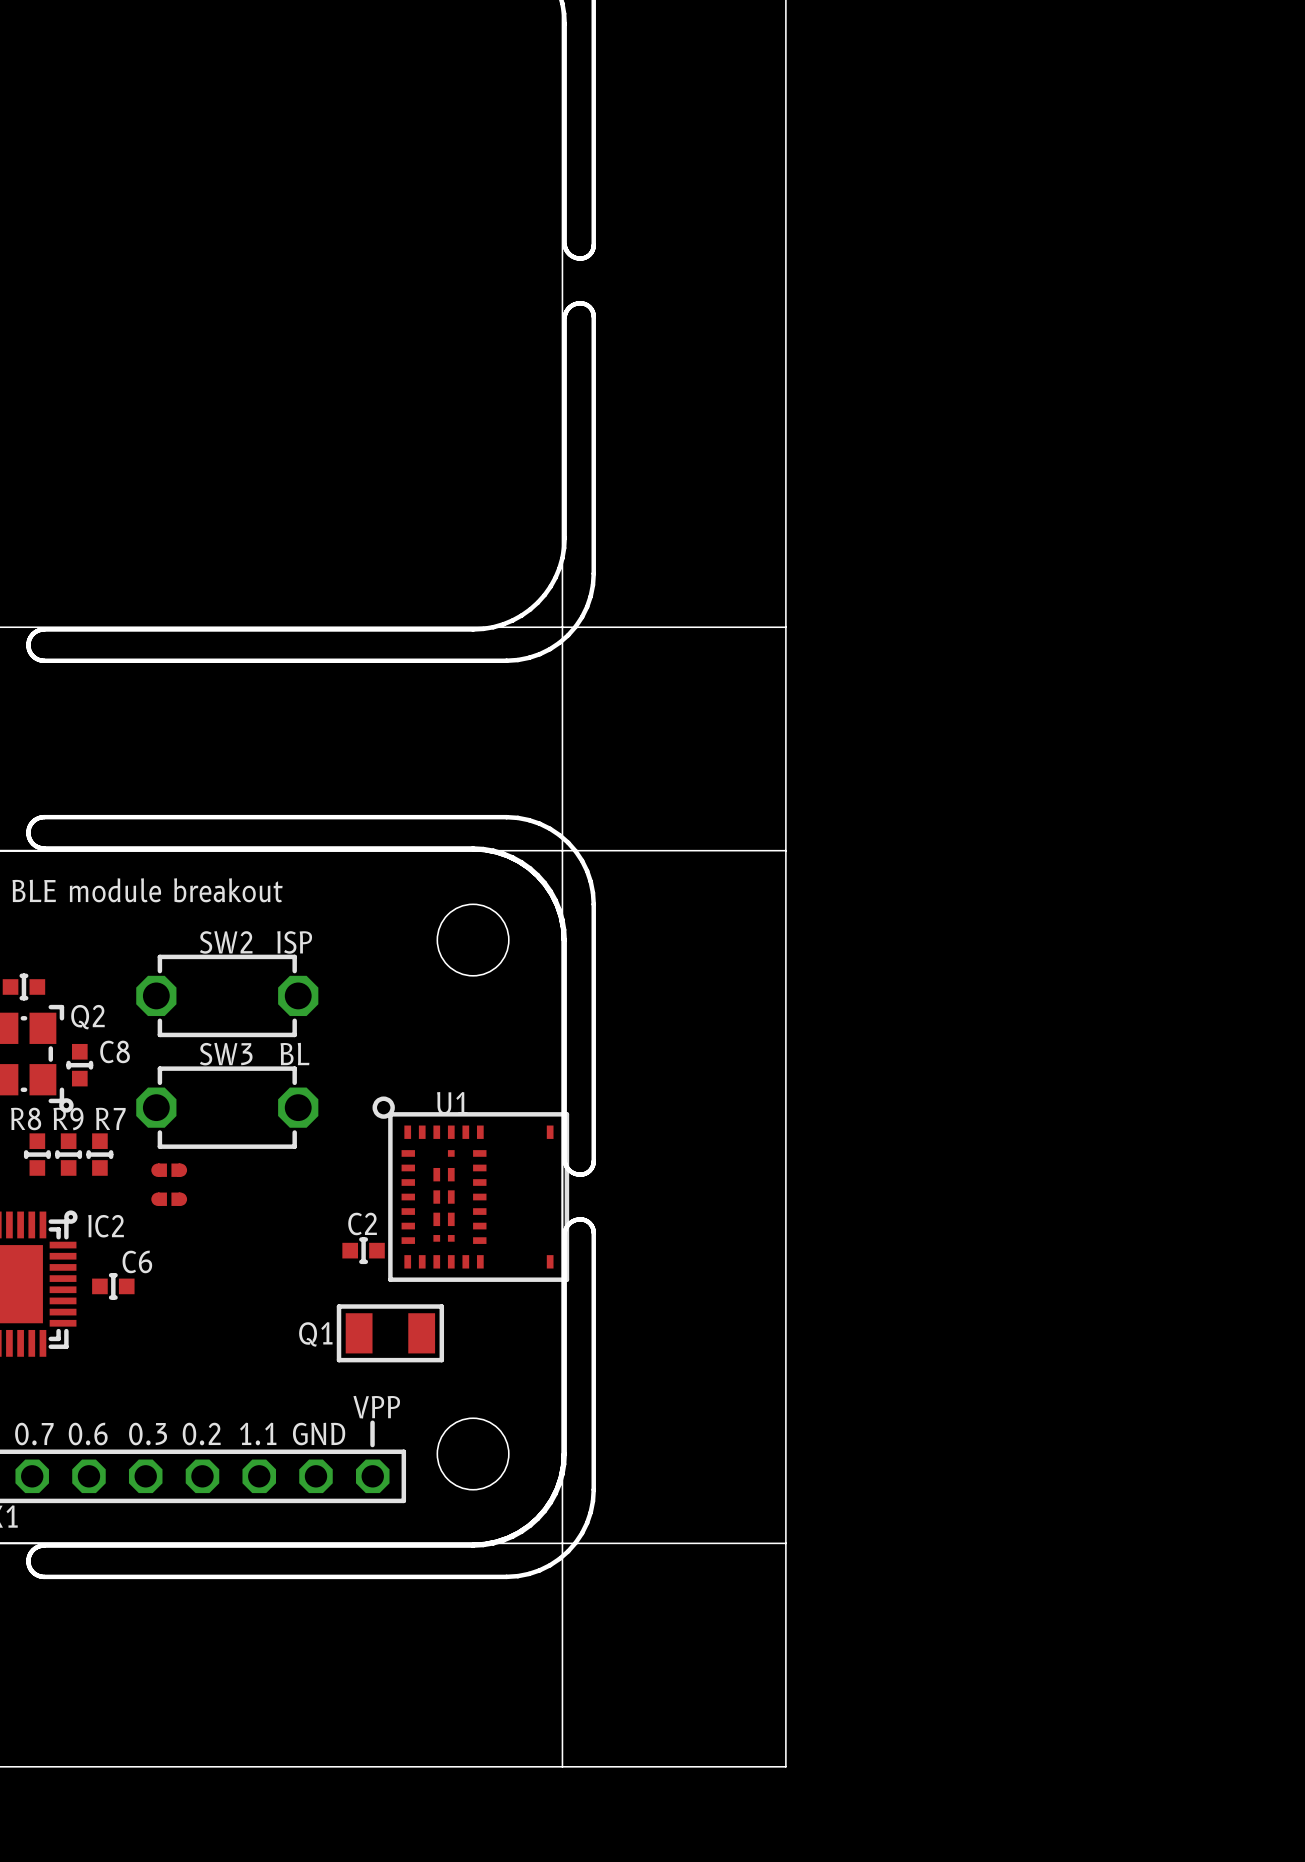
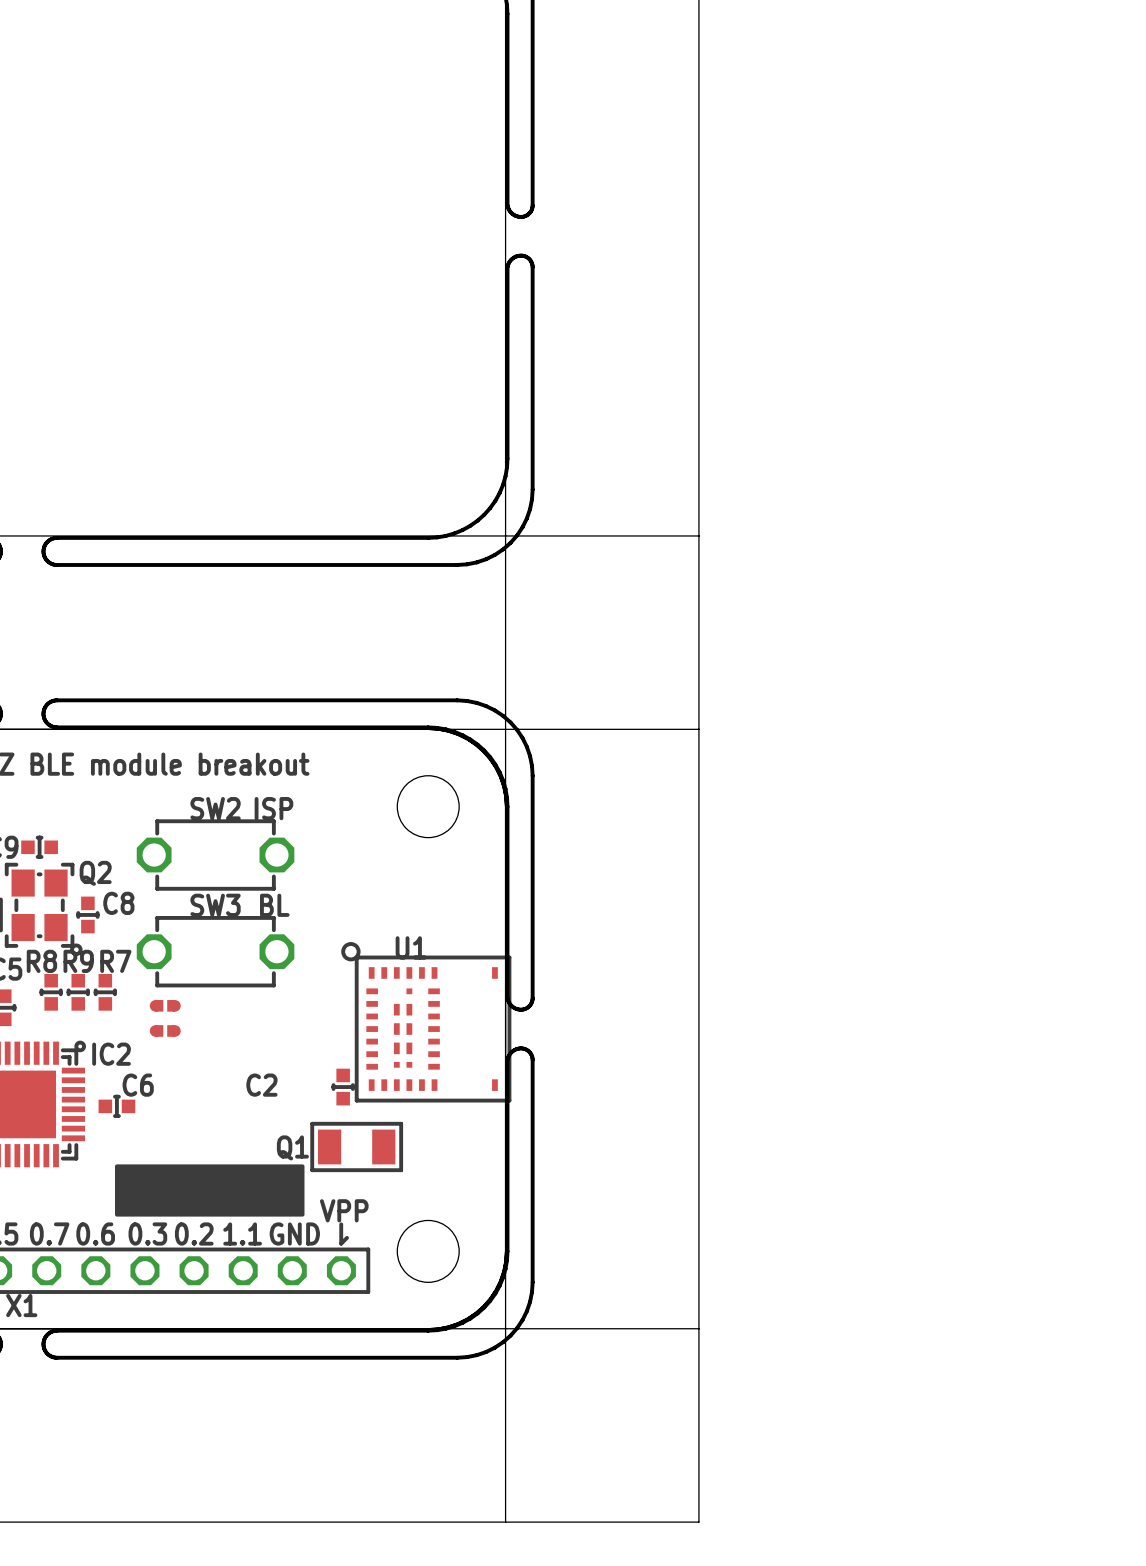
C2 name position: C2 (362, 1223) -> C2 (261, 1085)
C2 rotation: 0° (363, 1250) -> 90° clockwise (343, 1087)
drawing: none -> [114, 1164, 305, 1217]
line: none -> (347, 1237) (341, 1243)

